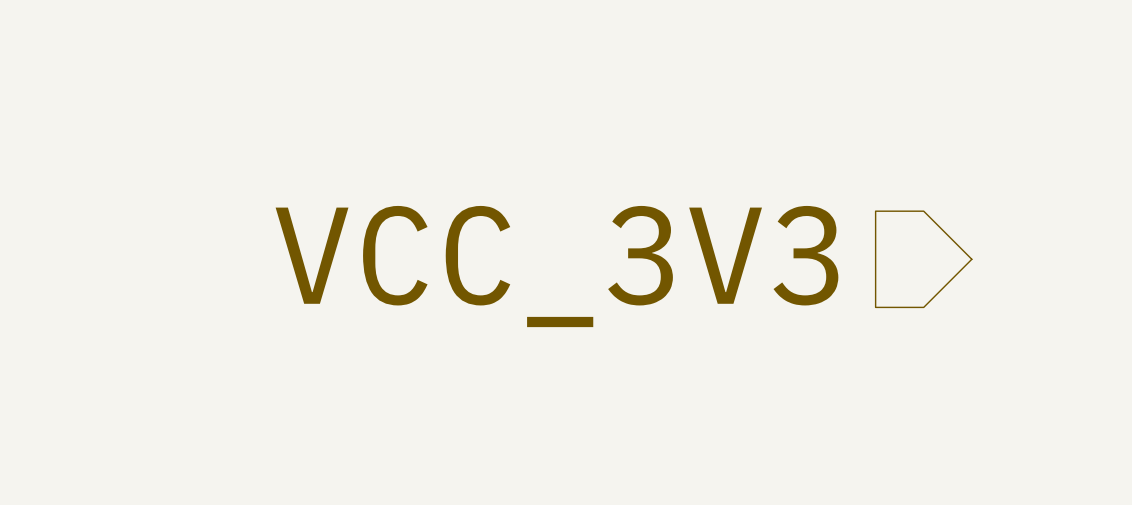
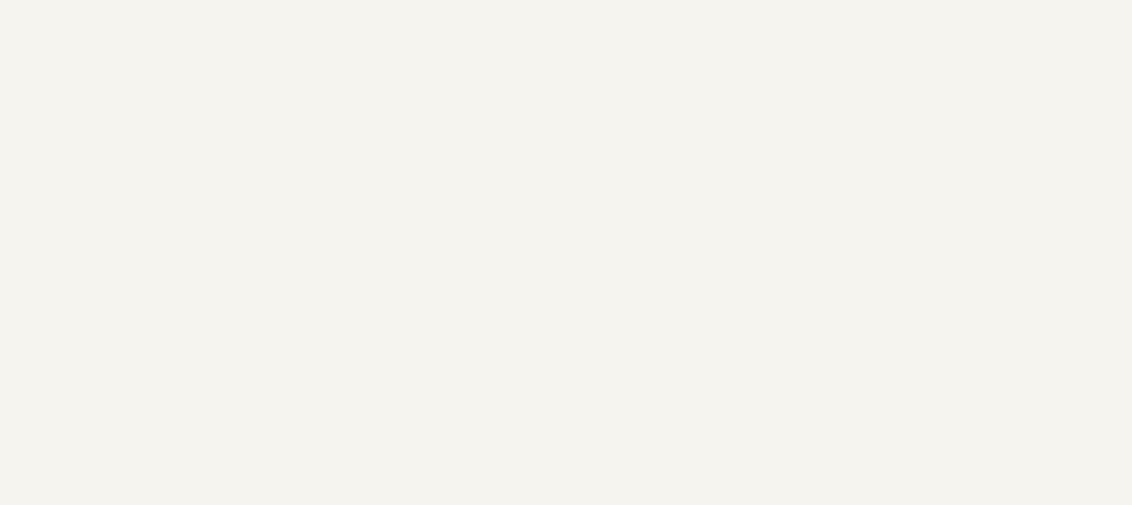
hierarchical label: VCC_3V3 (556, 266) -> none

